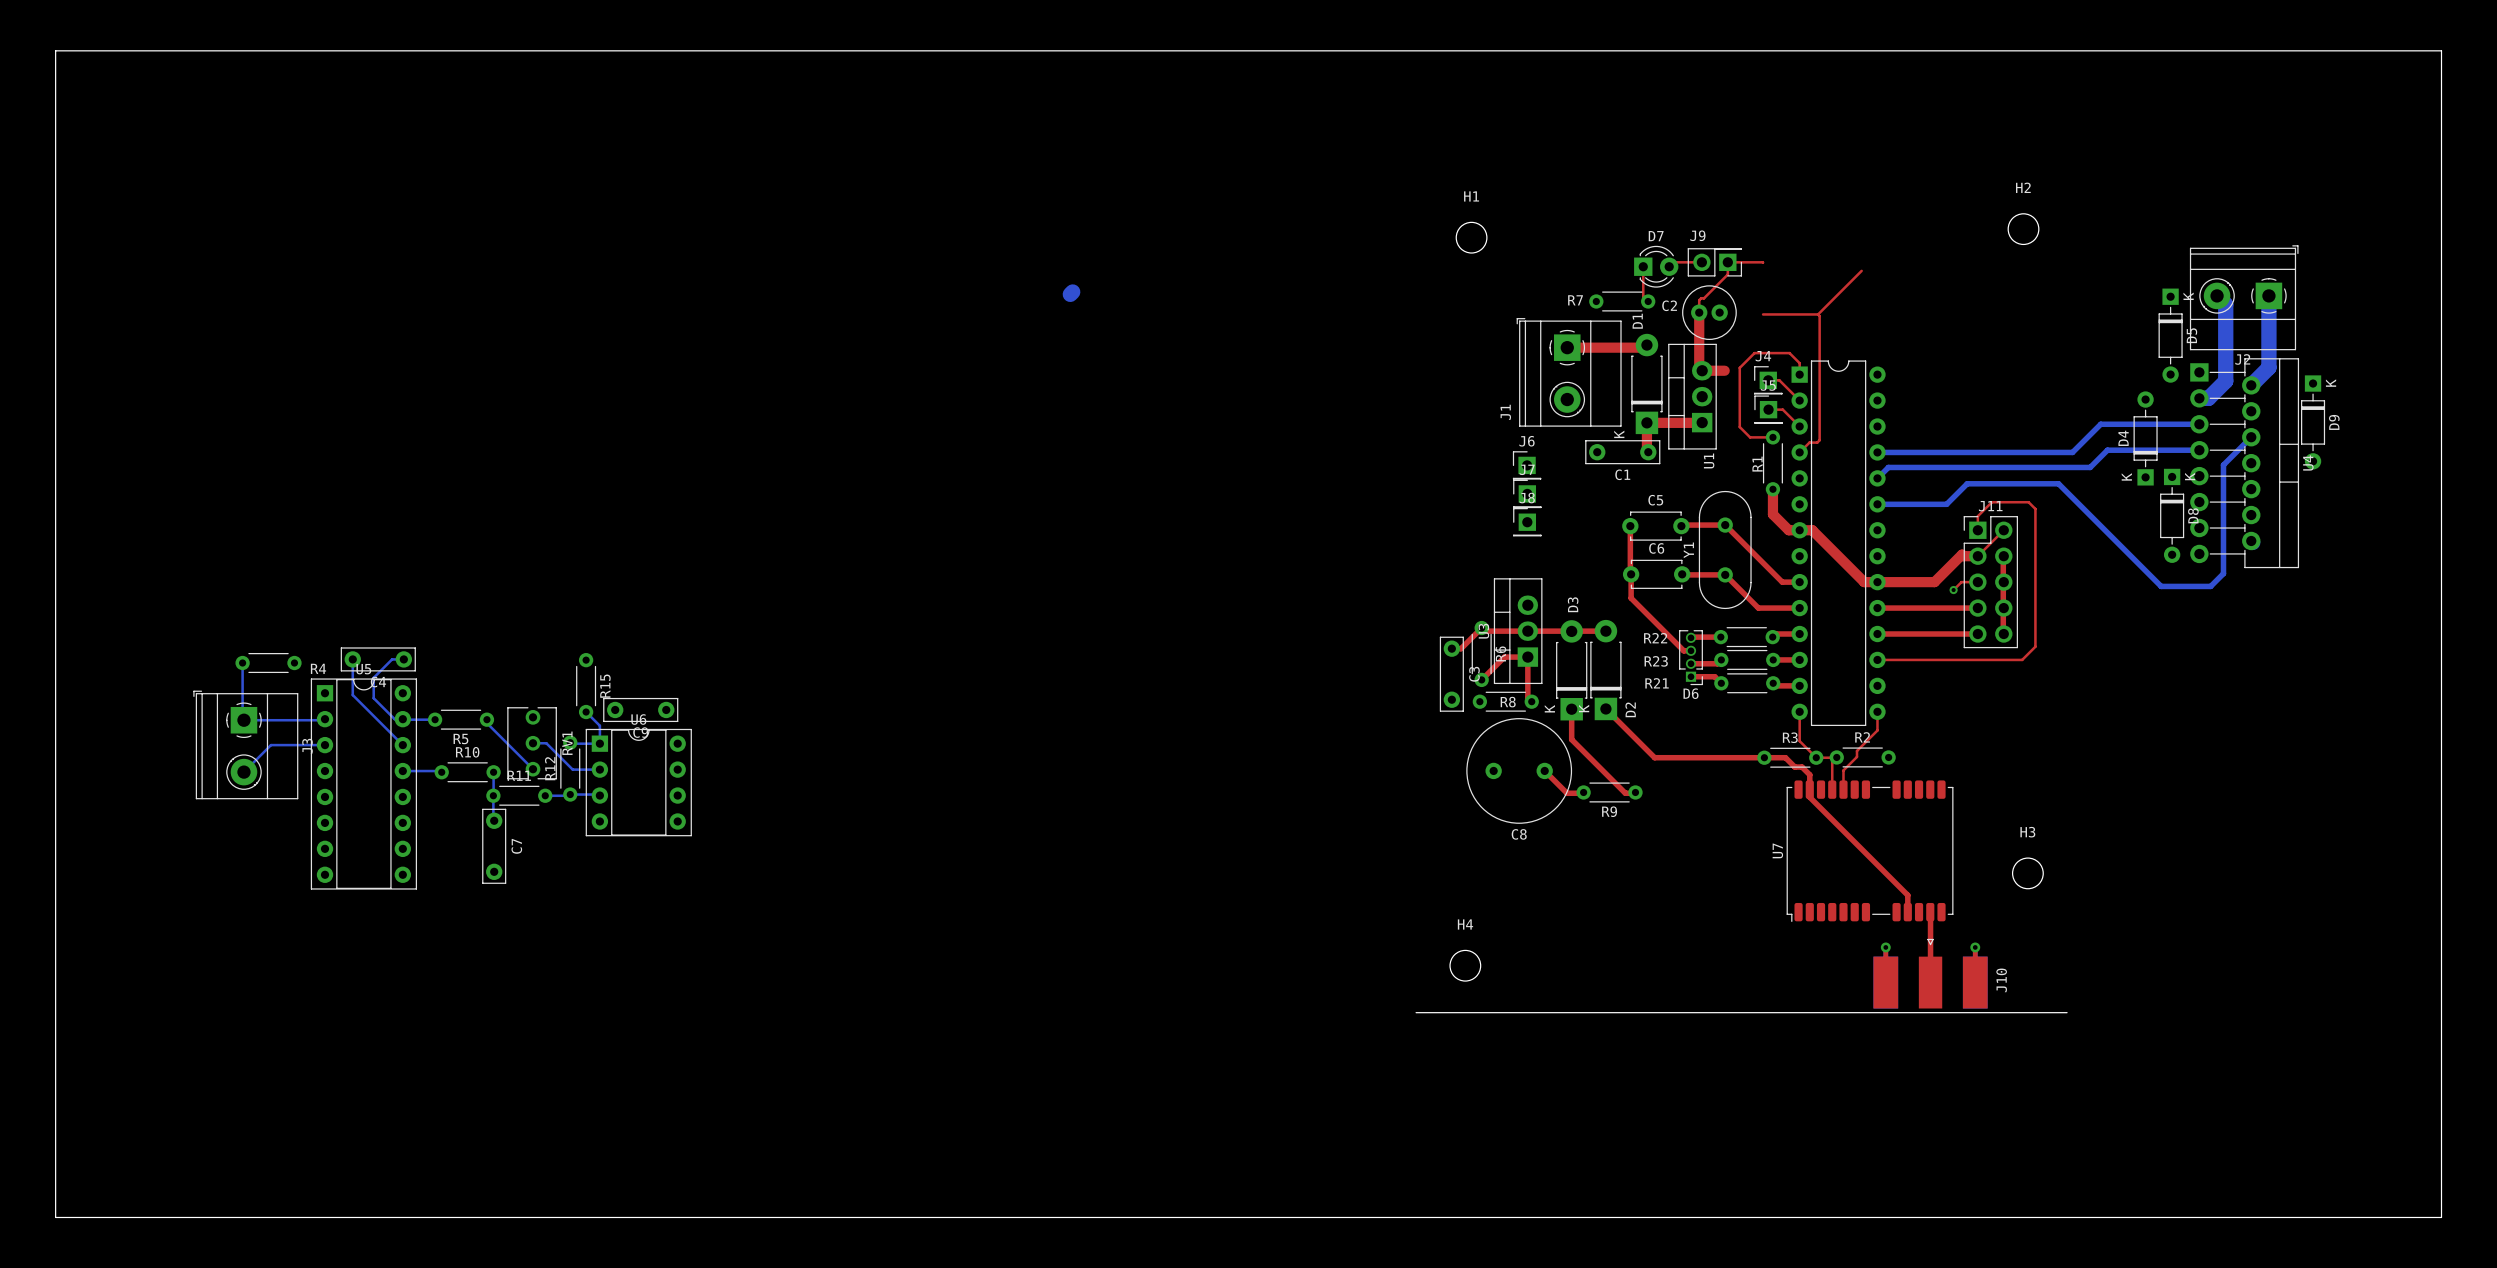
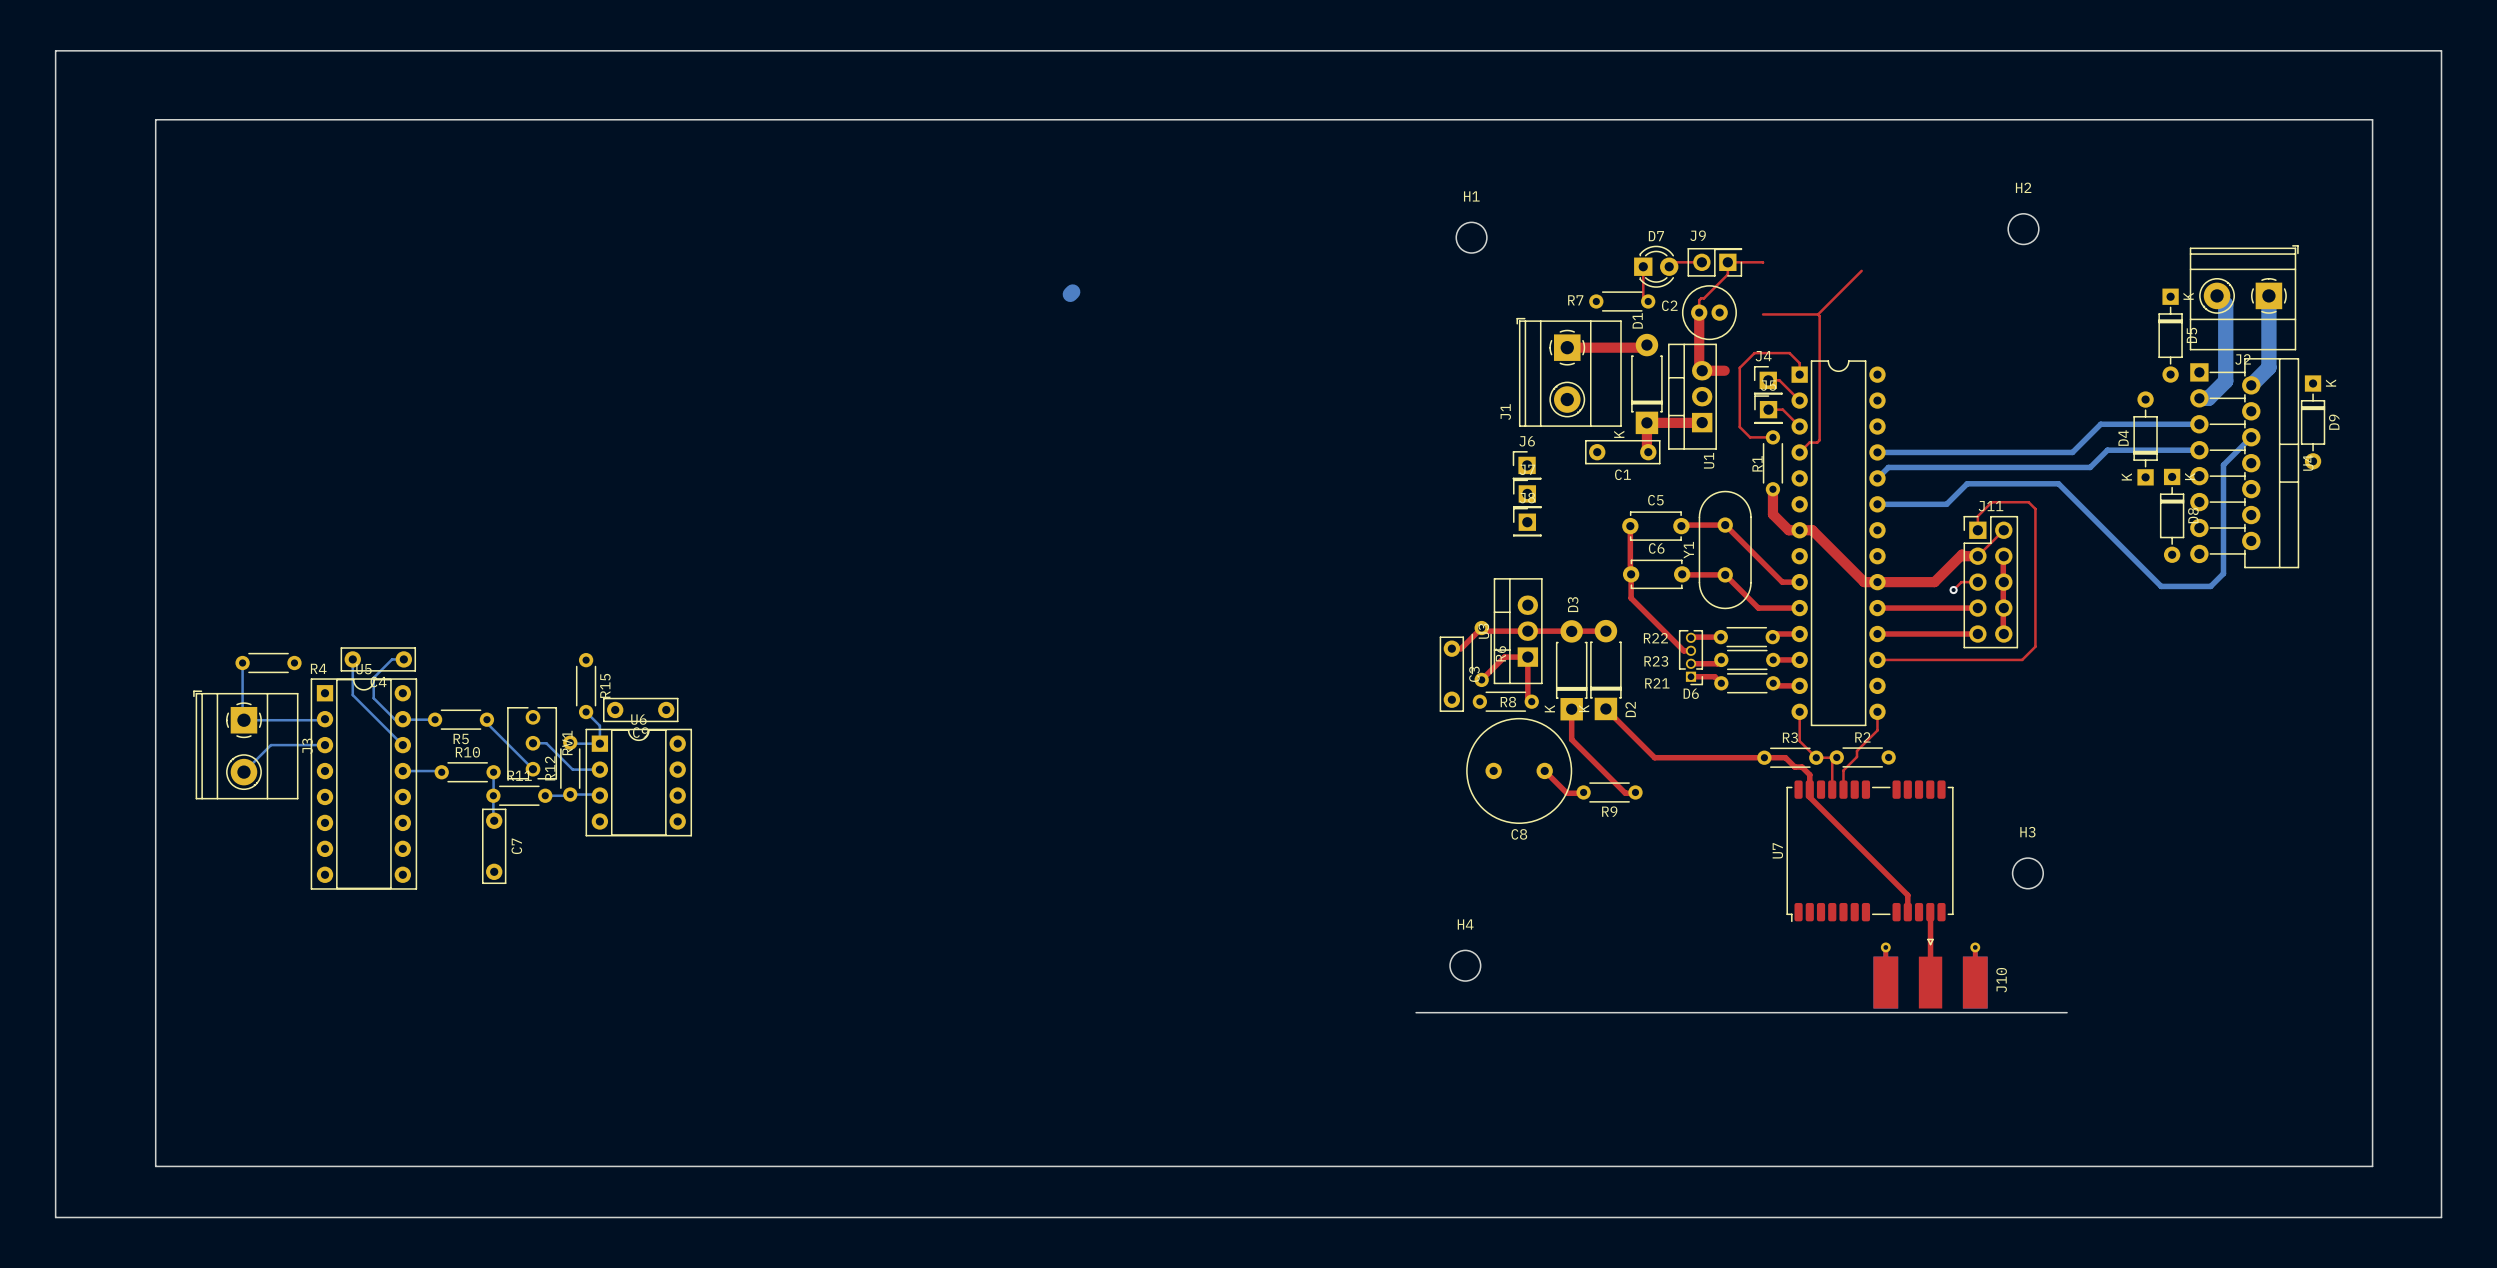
board edge: none -> (155, 119) (2372, 119) (2372, 1166) (155, 1166) (155, 119)

